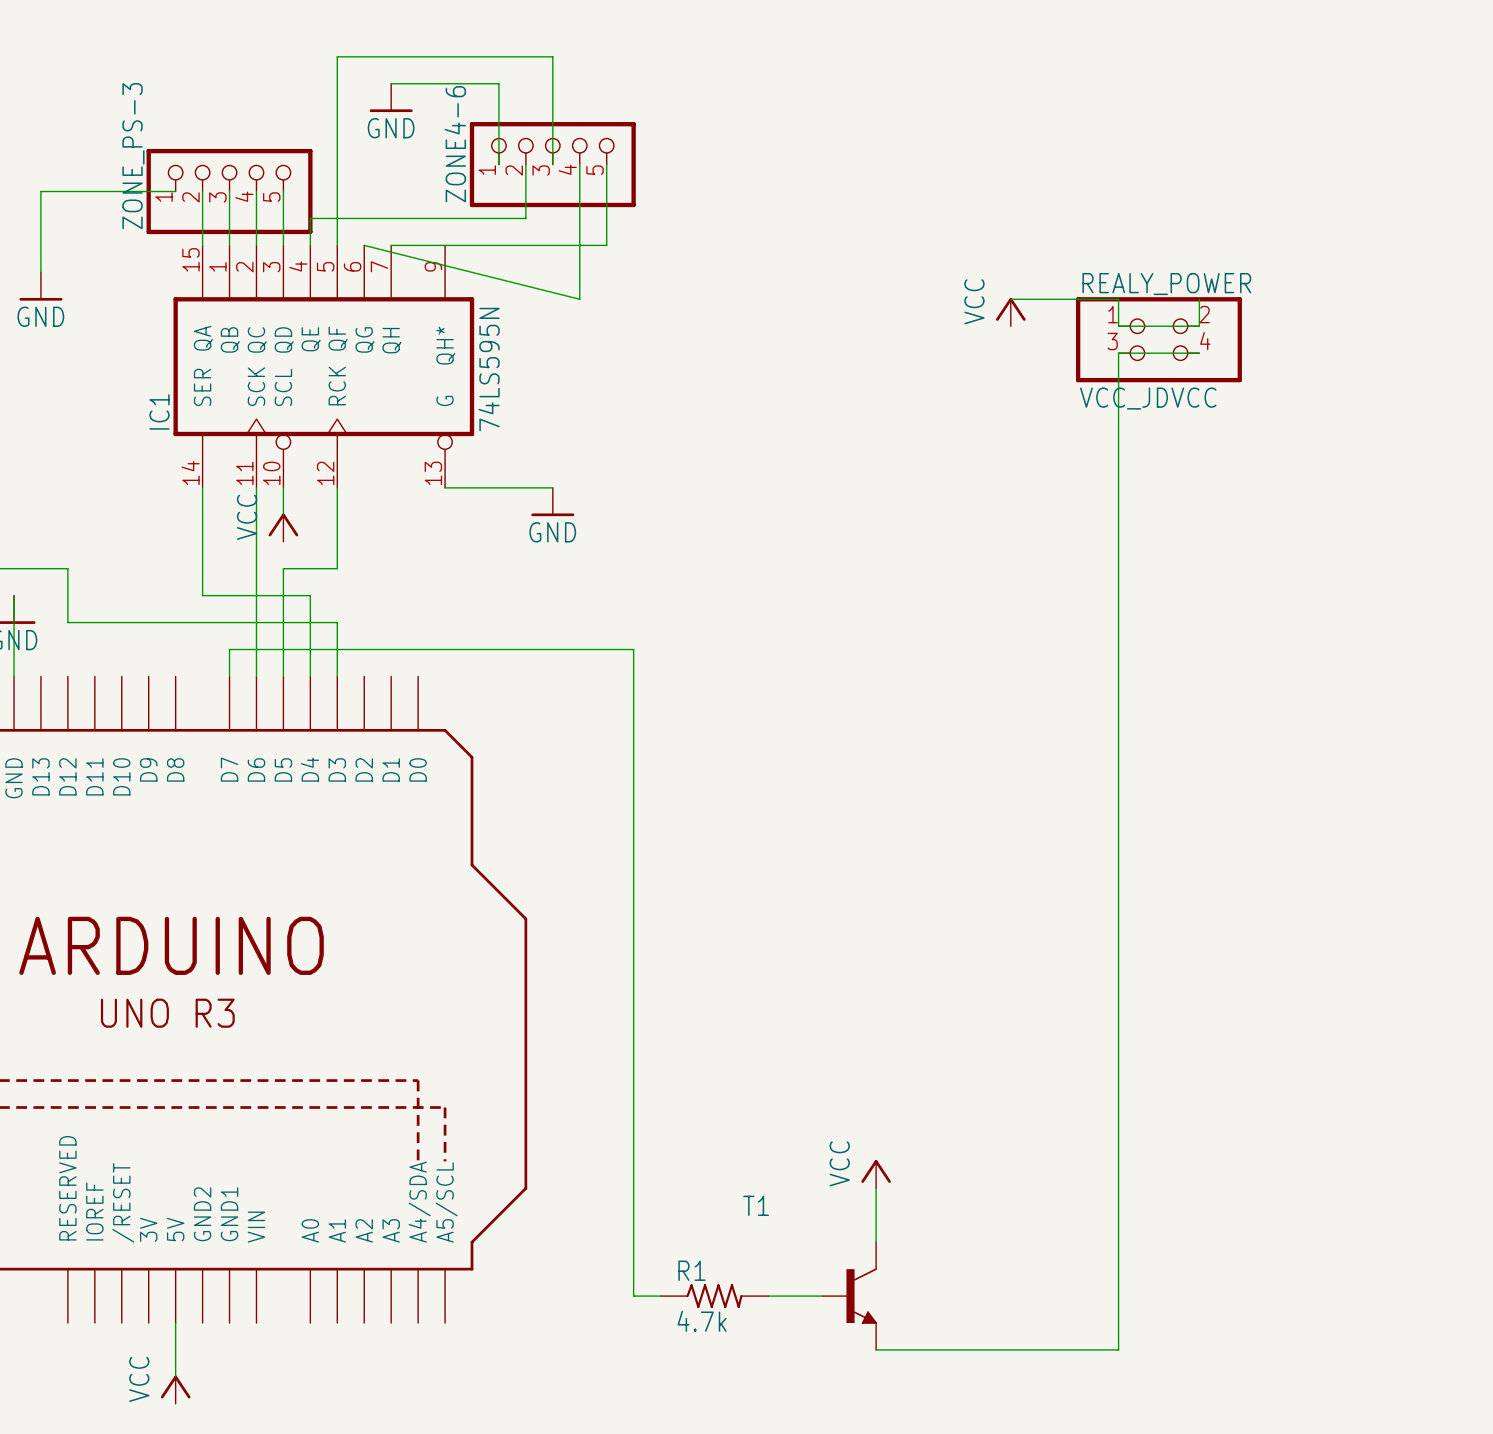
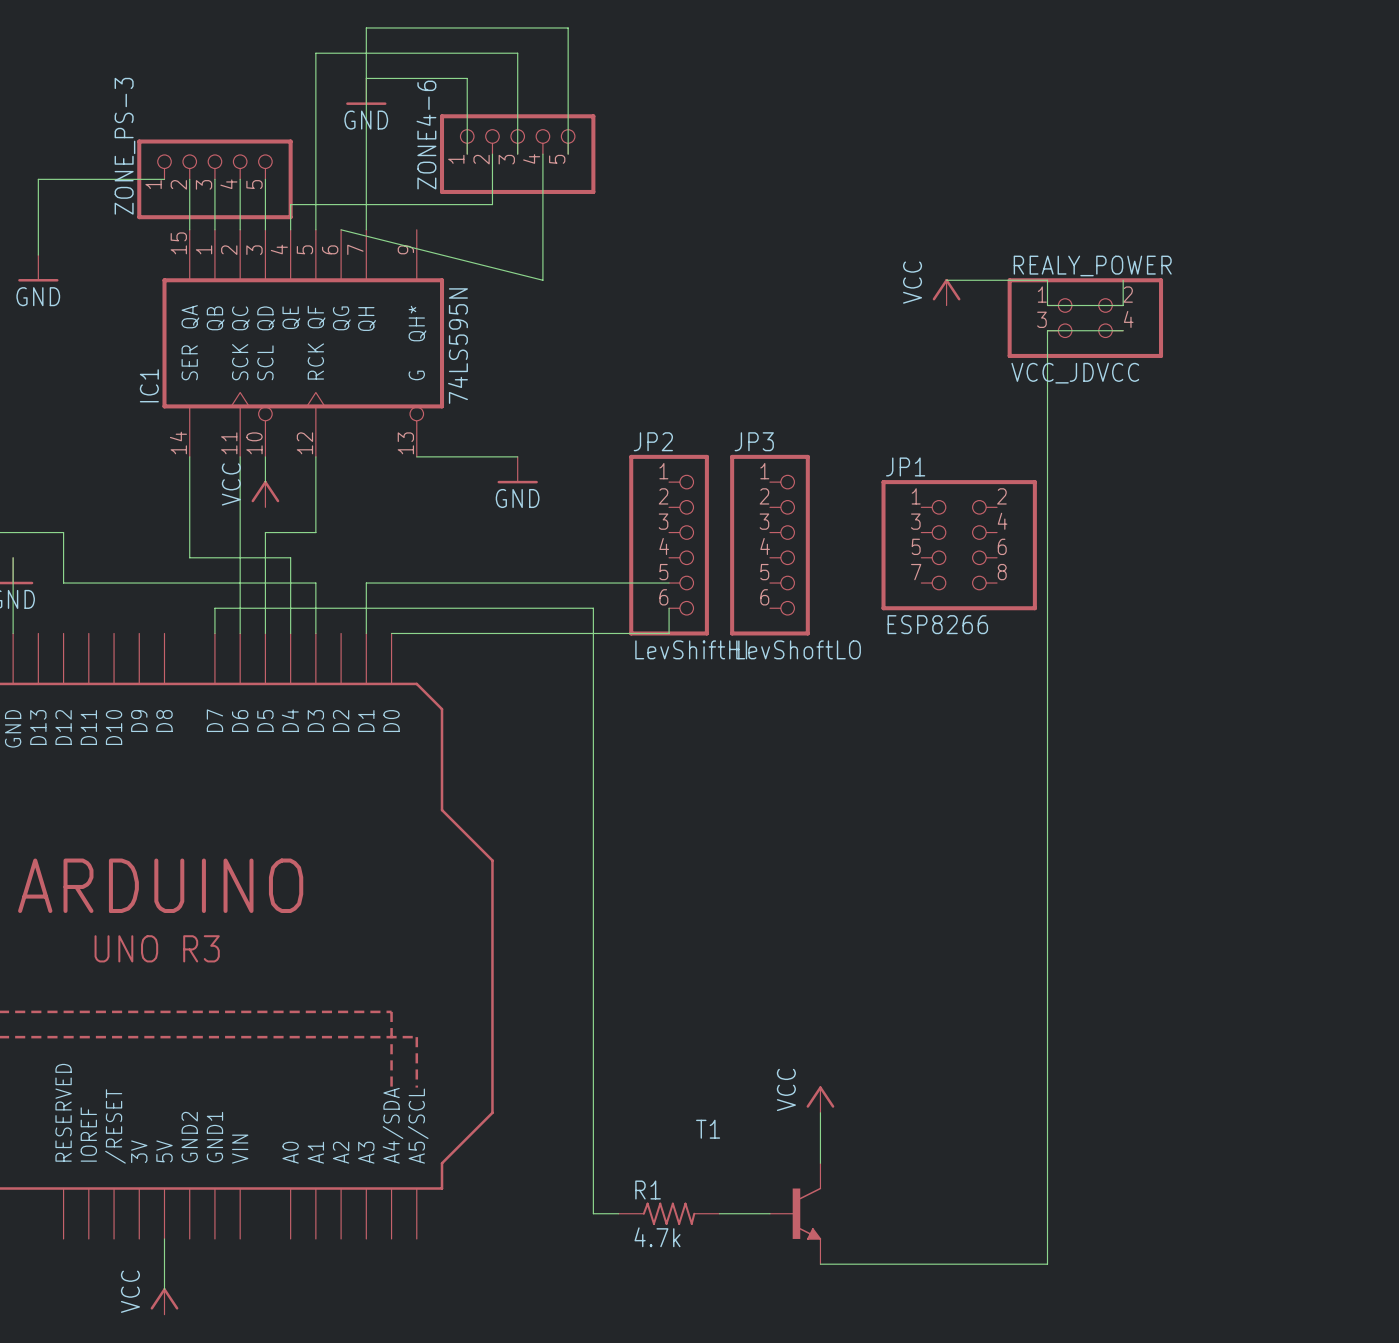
wire: (606, 164) (606, 245) (391, 245) -> (568, 154) (568, 27) (366, 27) (366, 229)
JP2: none -> LevShiftHI (669, 545)
JP3: none -> LevShoftLO (769, 545)
JP1: none -> ESP8266 (959, 545)
wire: none -> (669, 583) (366, 583) (366, 633)
wire: none -> (669, 608) (669, 633) (391, 633)

